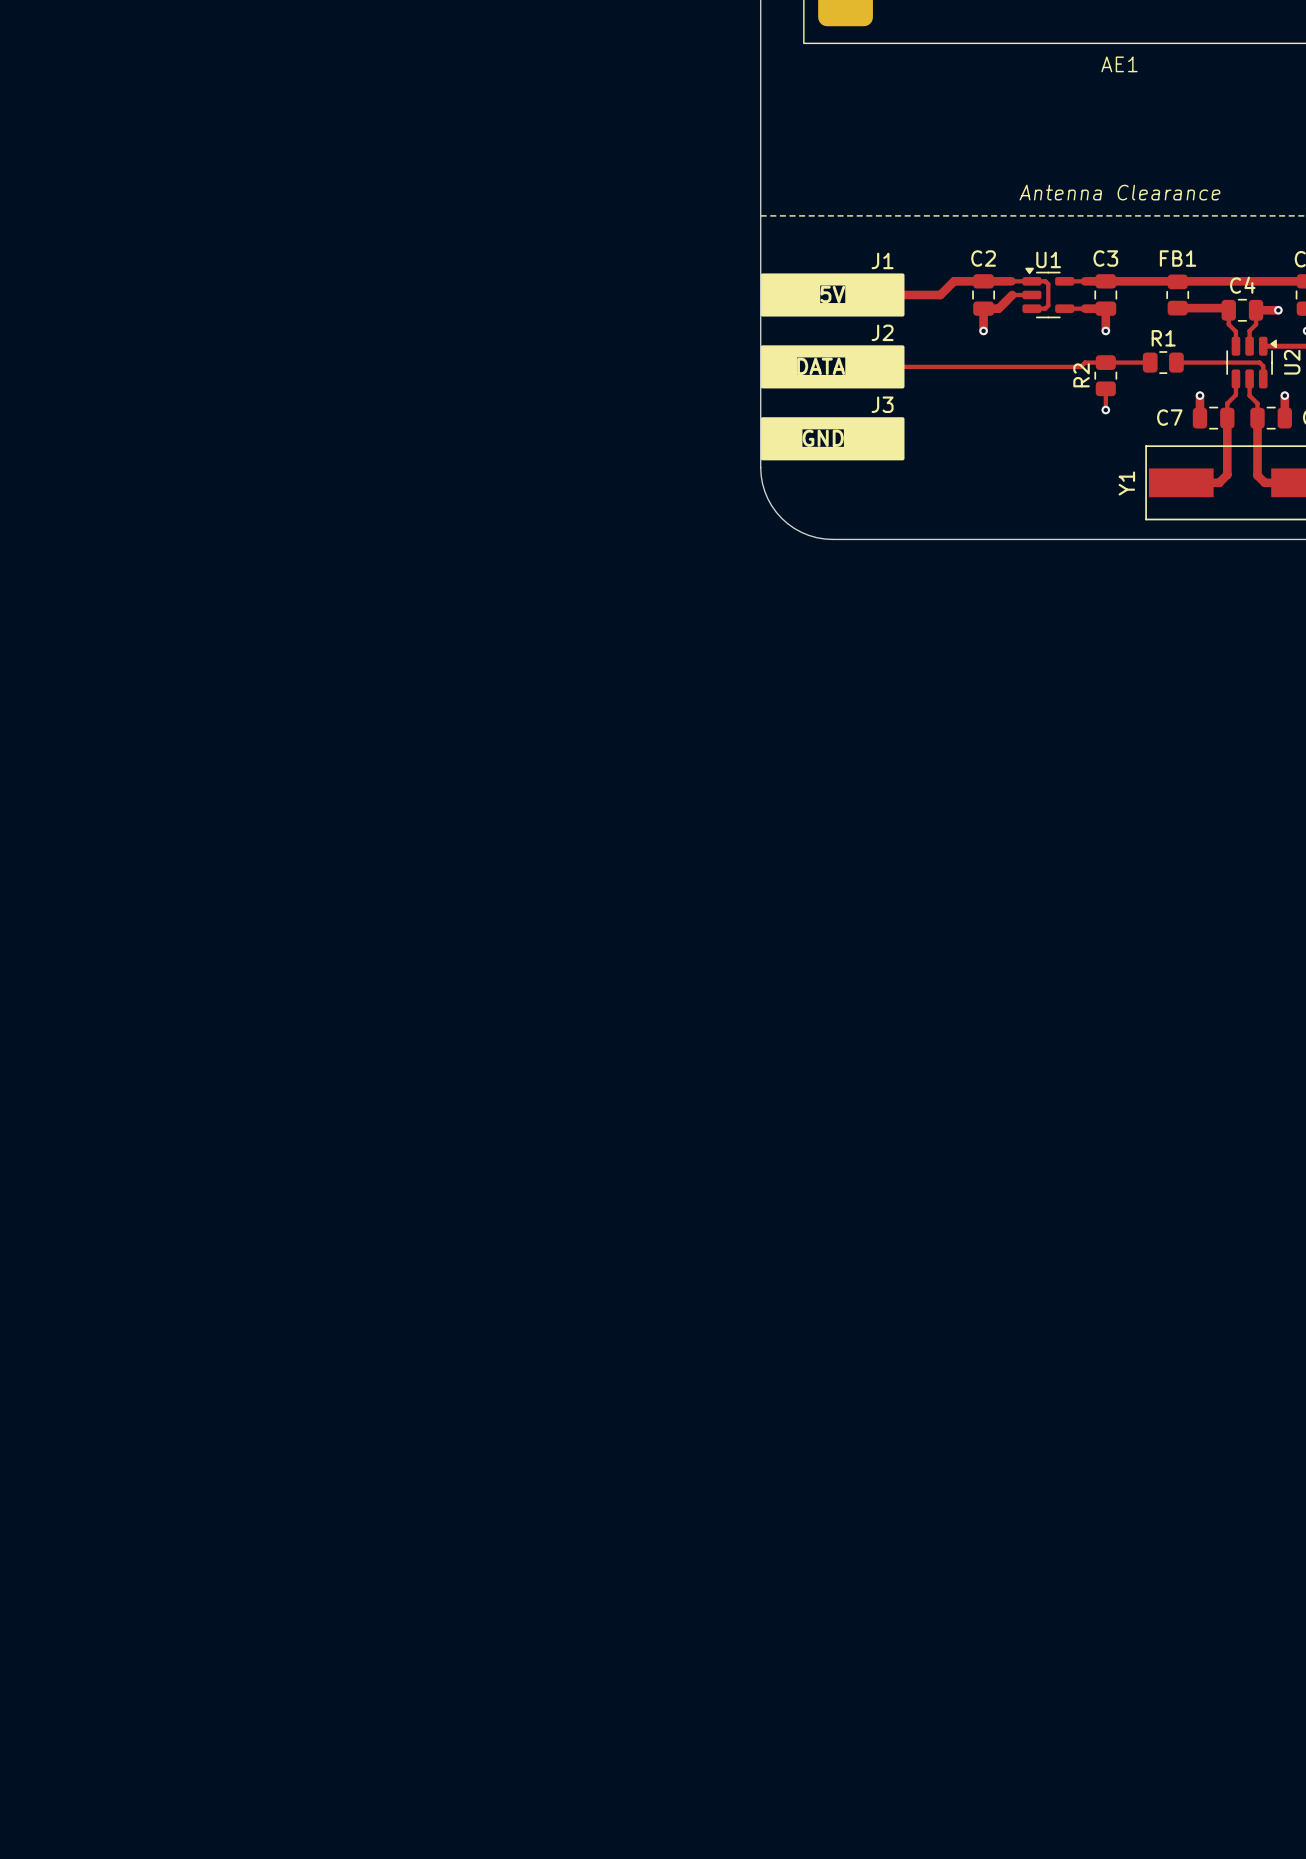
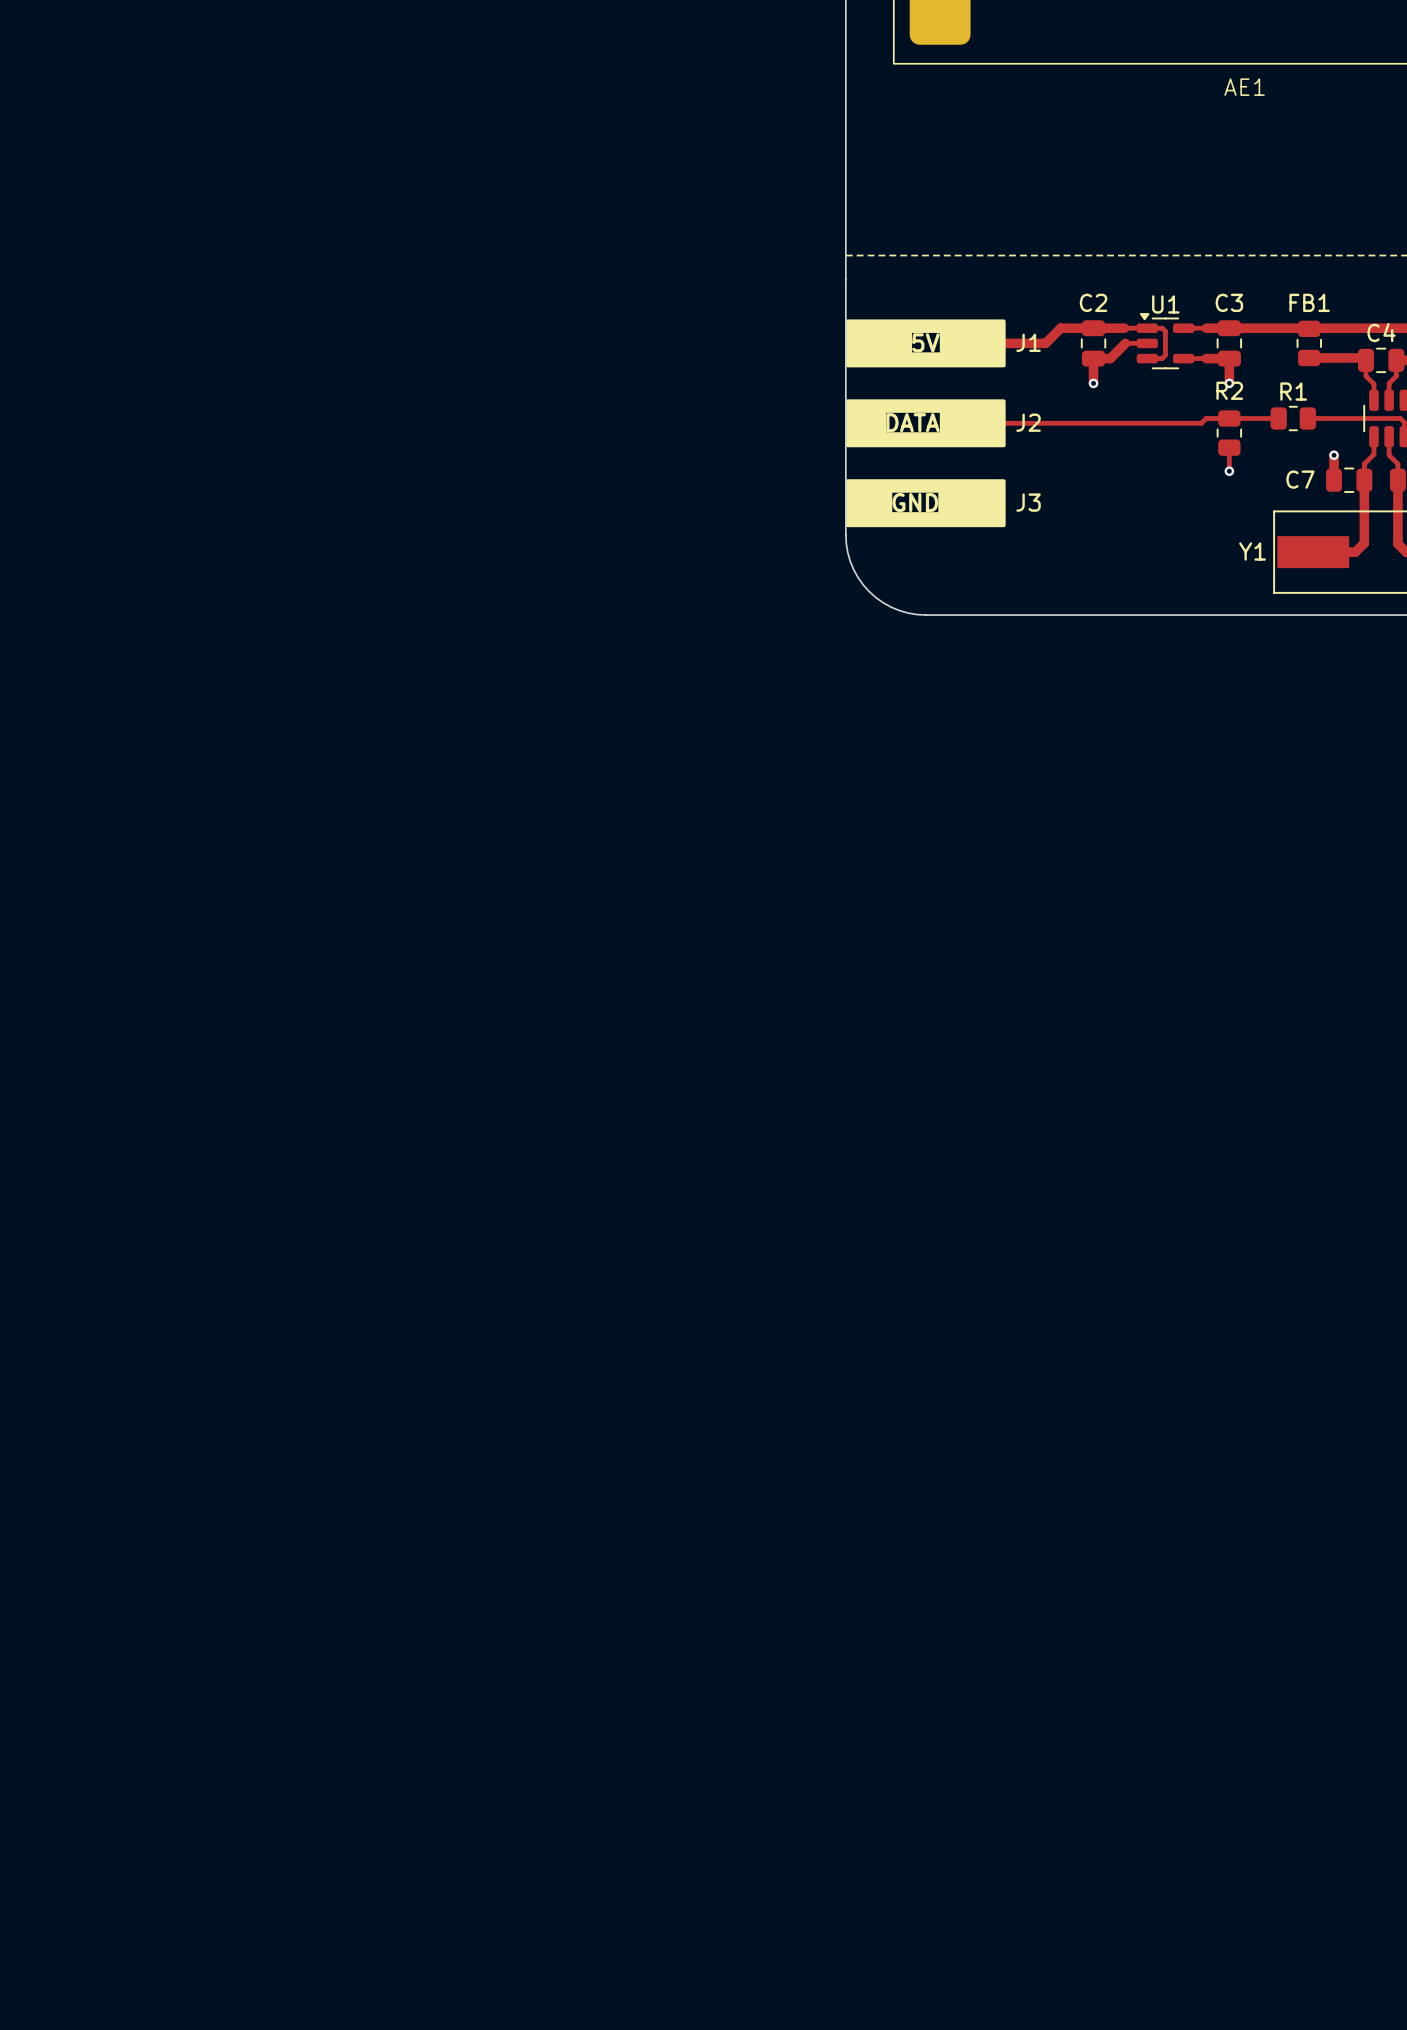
text: Antenna Clearance (1119, 192) -> none
J1 name position: J1 (882, 260) -> J1 (1028, 342)
J2 name position: J2 (882, 332) -> J2 (1028, 422)
R2 name rotation: 0° (1081, 375) -> 90° clockwise (1229, 390)
R2 name position: R2 (1081, 375) -> R2 (1229, 390)
J3 name position: J3 (882, 404) -> J3 (1028, 502)
Y1 name rotation: 0° (1126, 483) -> 90° clockwise (1252, 551)

